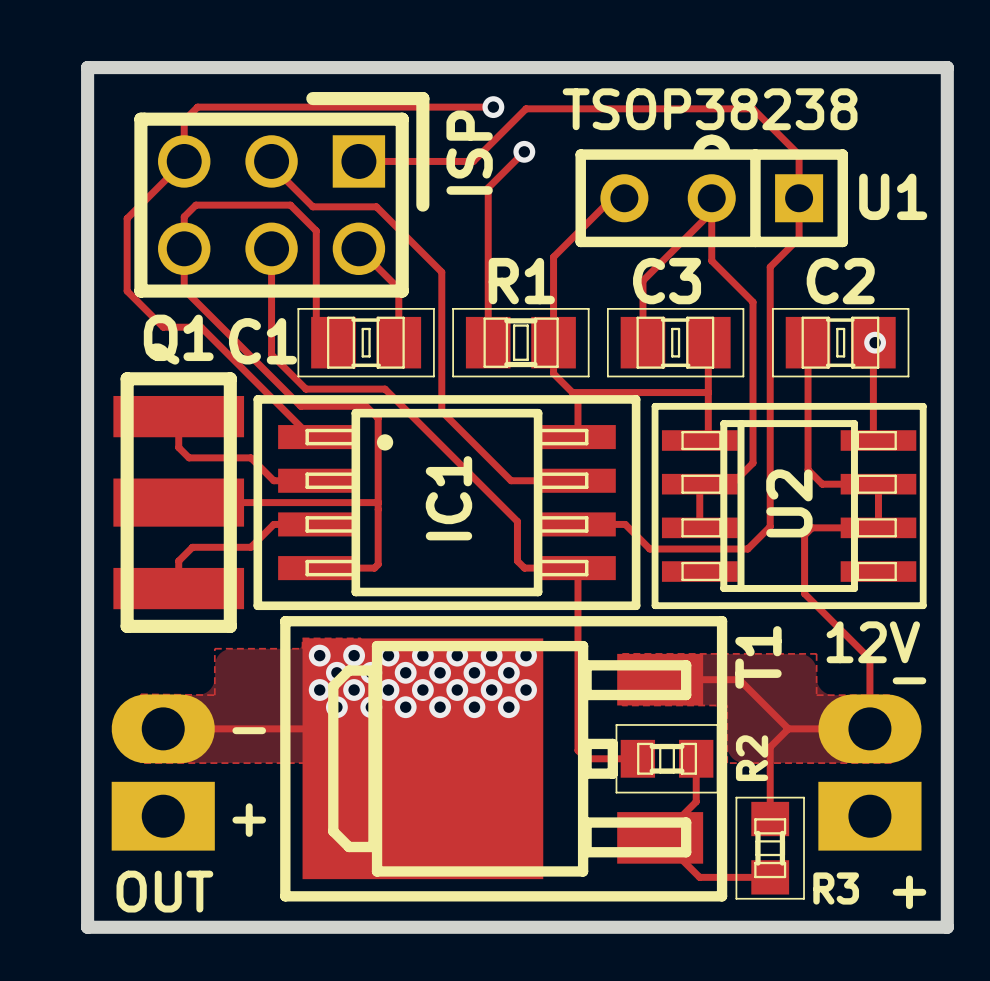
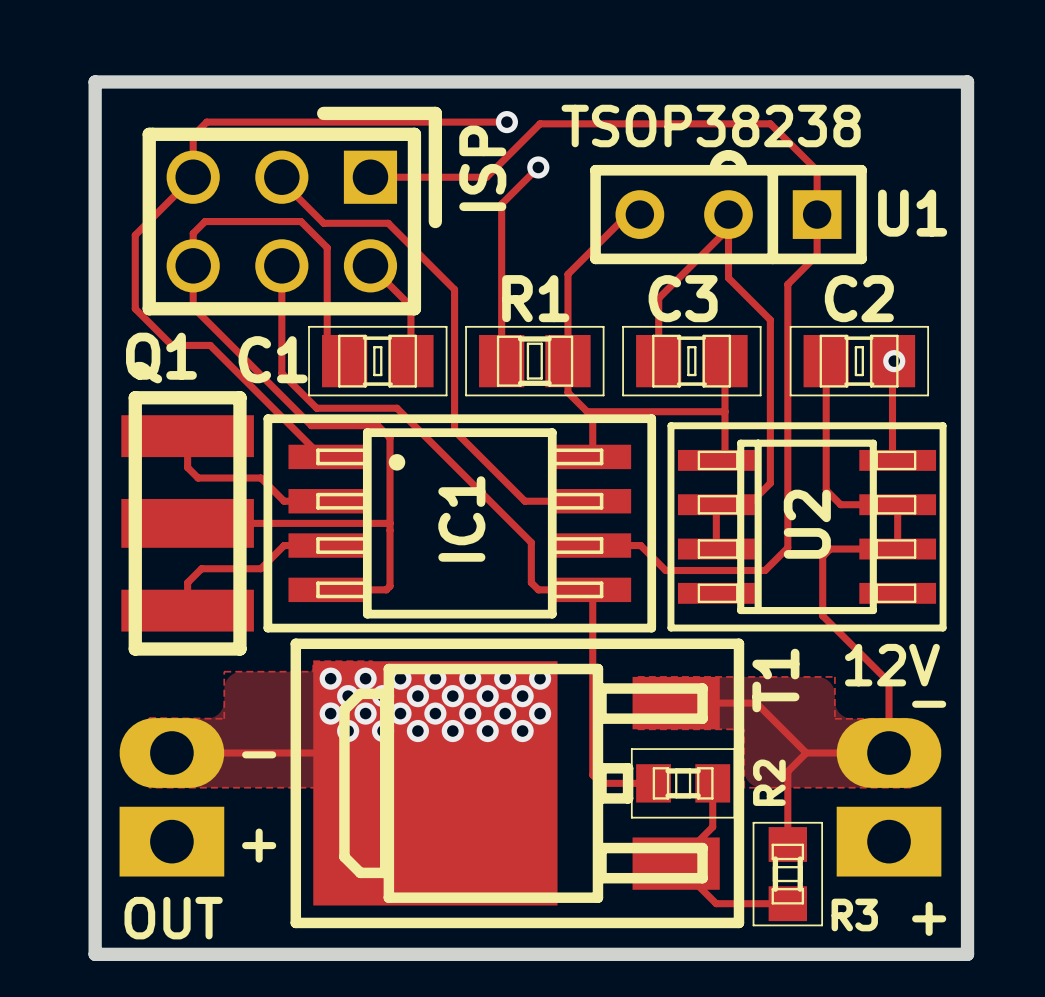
text position: TSOP38238 (710, 109) -> TSOP38238 (711, 126)
Q1 name position: Q1 (178, 339) -> Q1 (161, 358)

